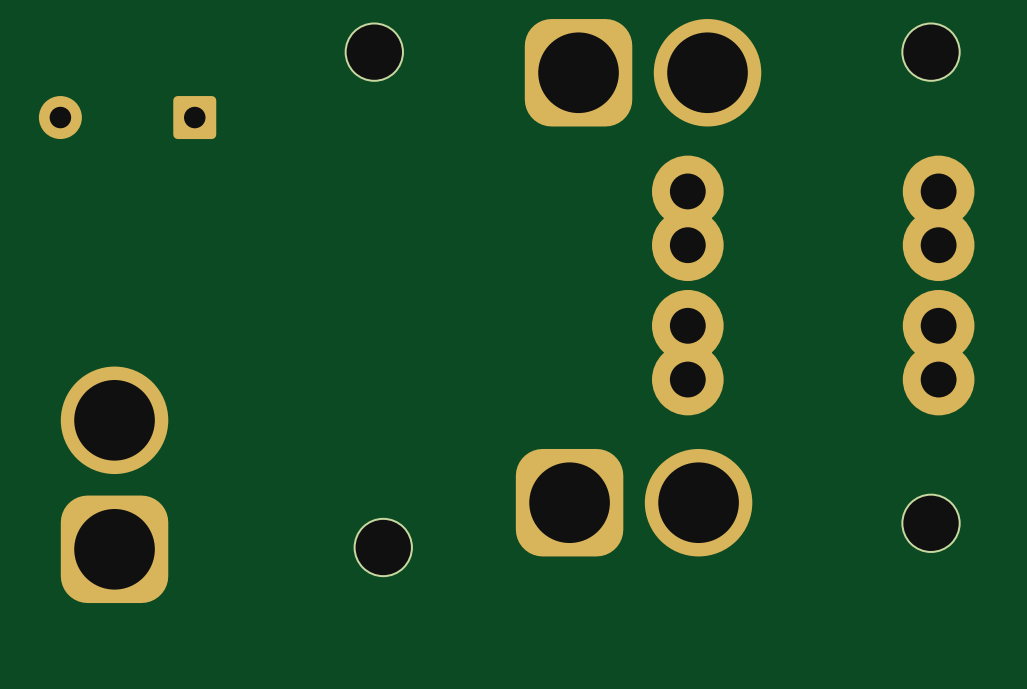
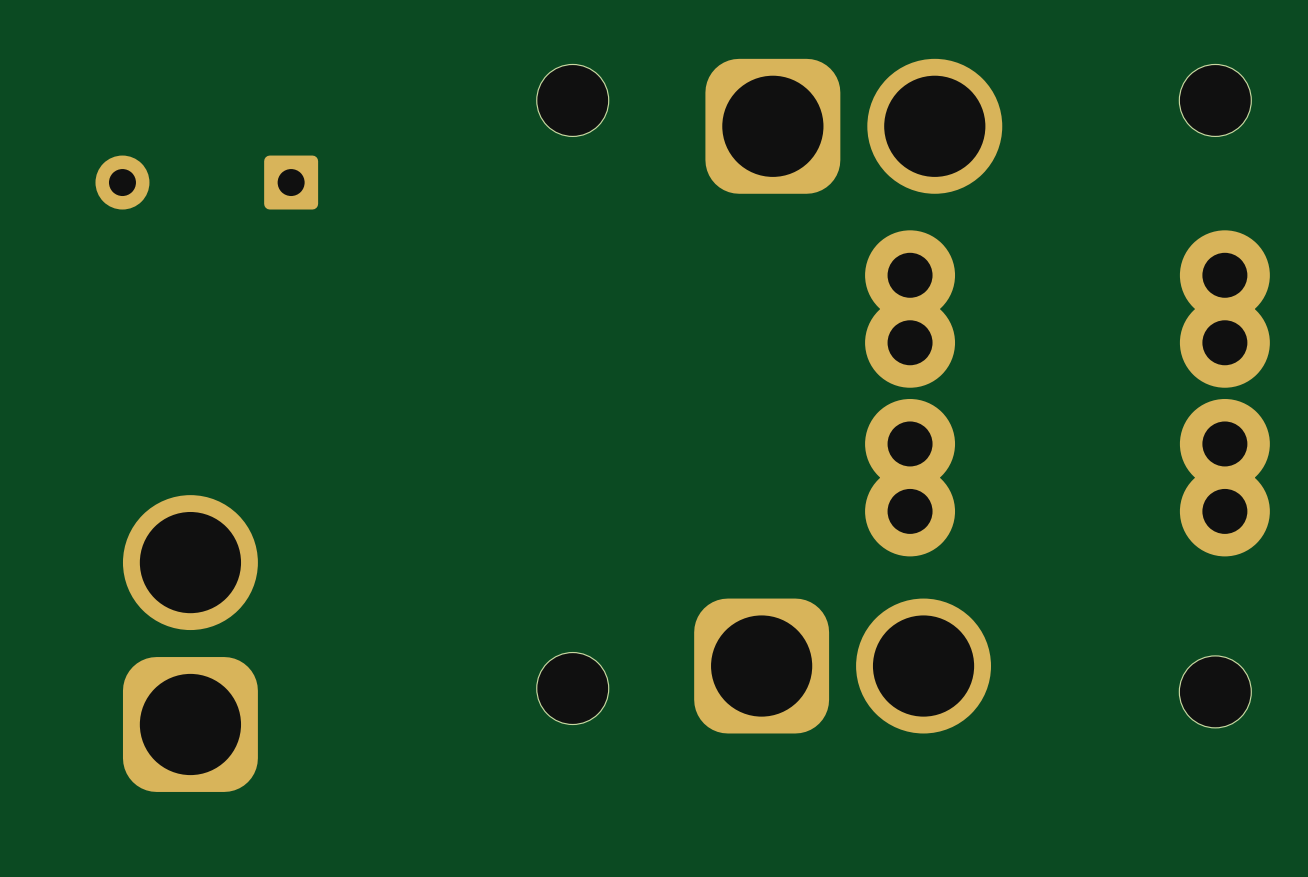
part position: (374, 52) -> (572, 100)
part position: (383, 547) -> (572, 688)

